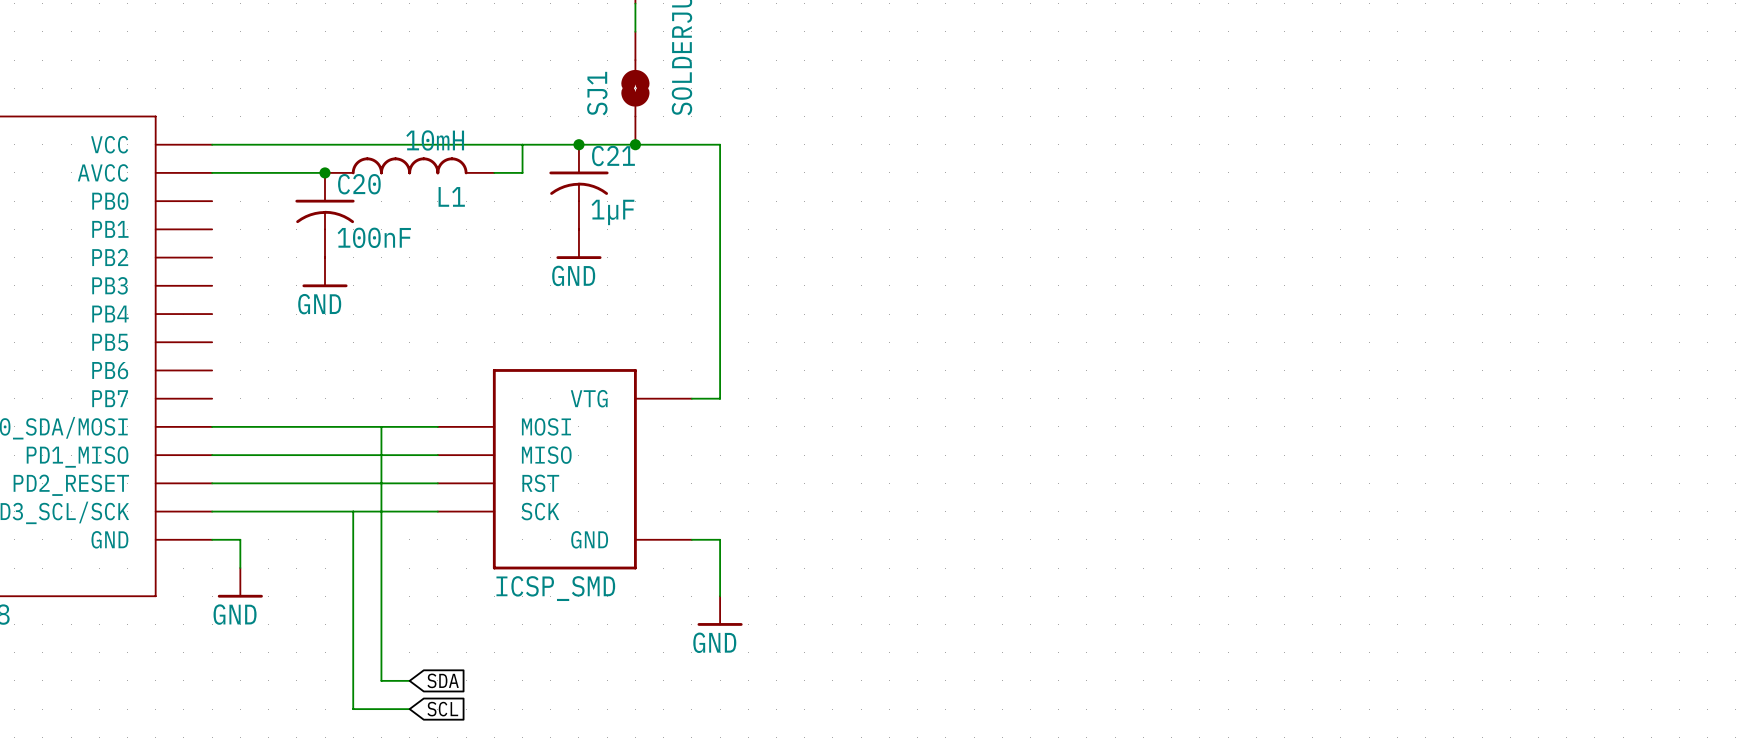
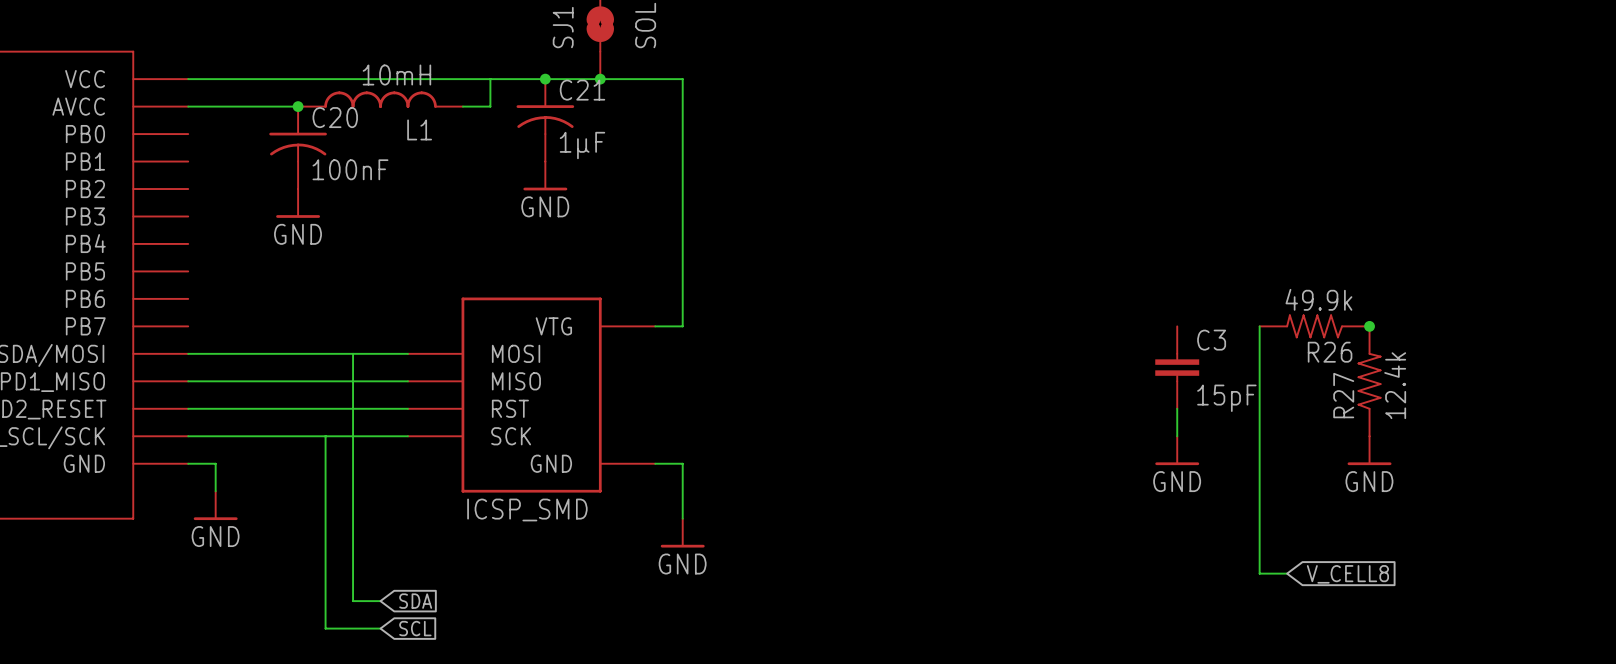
wire: none -> (1259, 326) (1259, 573) (1287, 573)
R26: none -> 49.9k (1314, 326)
junction: none -> (1369, 326)
C3: none -> 15pF (1177, 367)
R27: none -> 12.4k (1369, 381)
wire: none -> (1177, 408) (1177, 436)
power symbol: none -> GND (1177, 450)
power symbol: none -> GND (1369, 450)
global label: none -> V_CELL8 (1347, 574)

